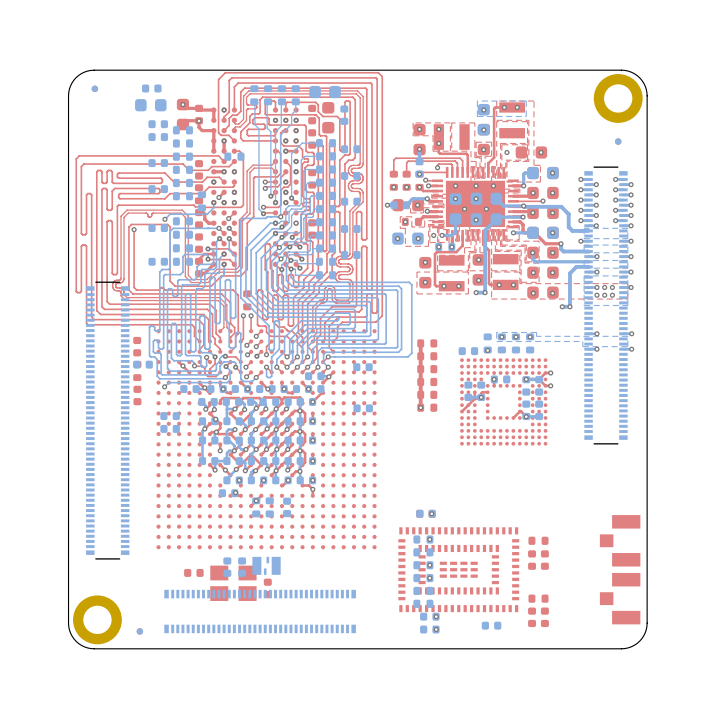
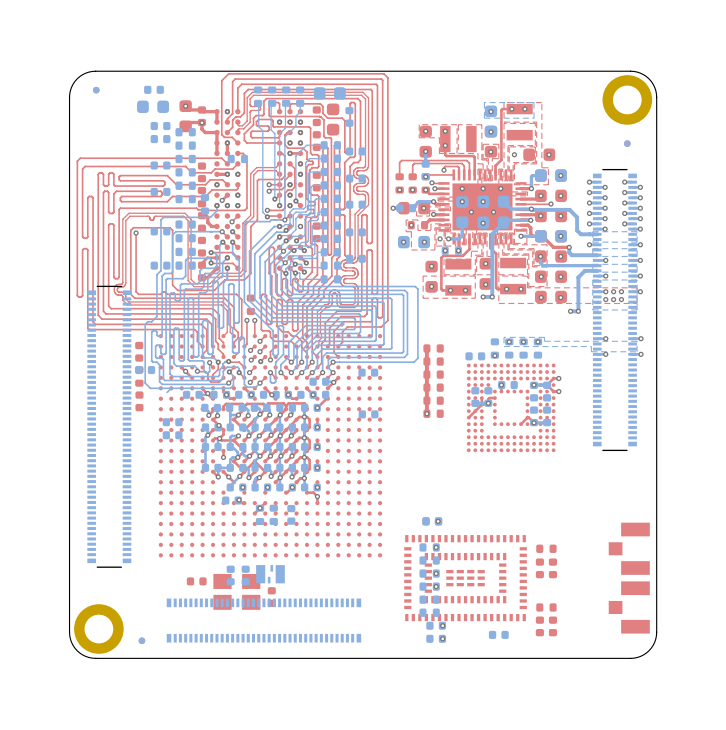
bottom track: (170, 214) (164, 219) -> (172, 217) (163, 217) (161, 219) (161, 270) (156, 274) (156, 316) (145, 324) (145, 383) (150, 388) (171, 388)
via: (164, 219) -> none
via: (164, 386) -> none

